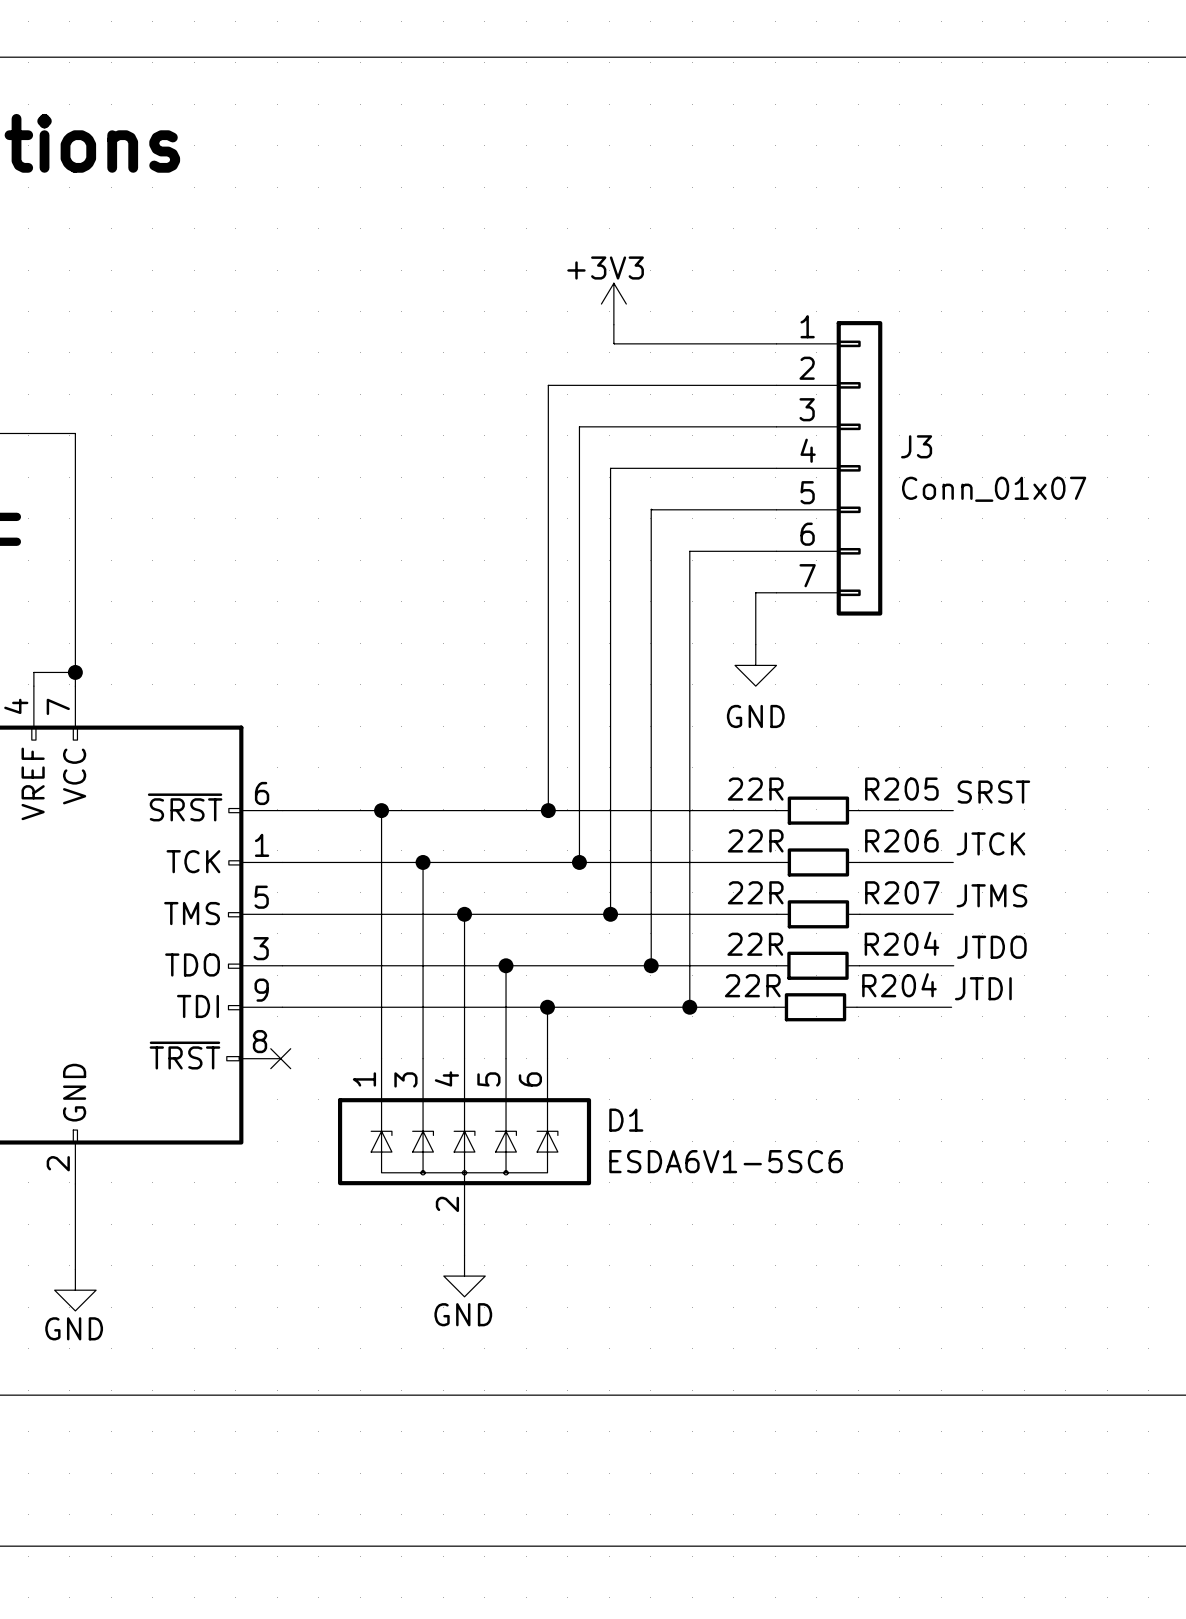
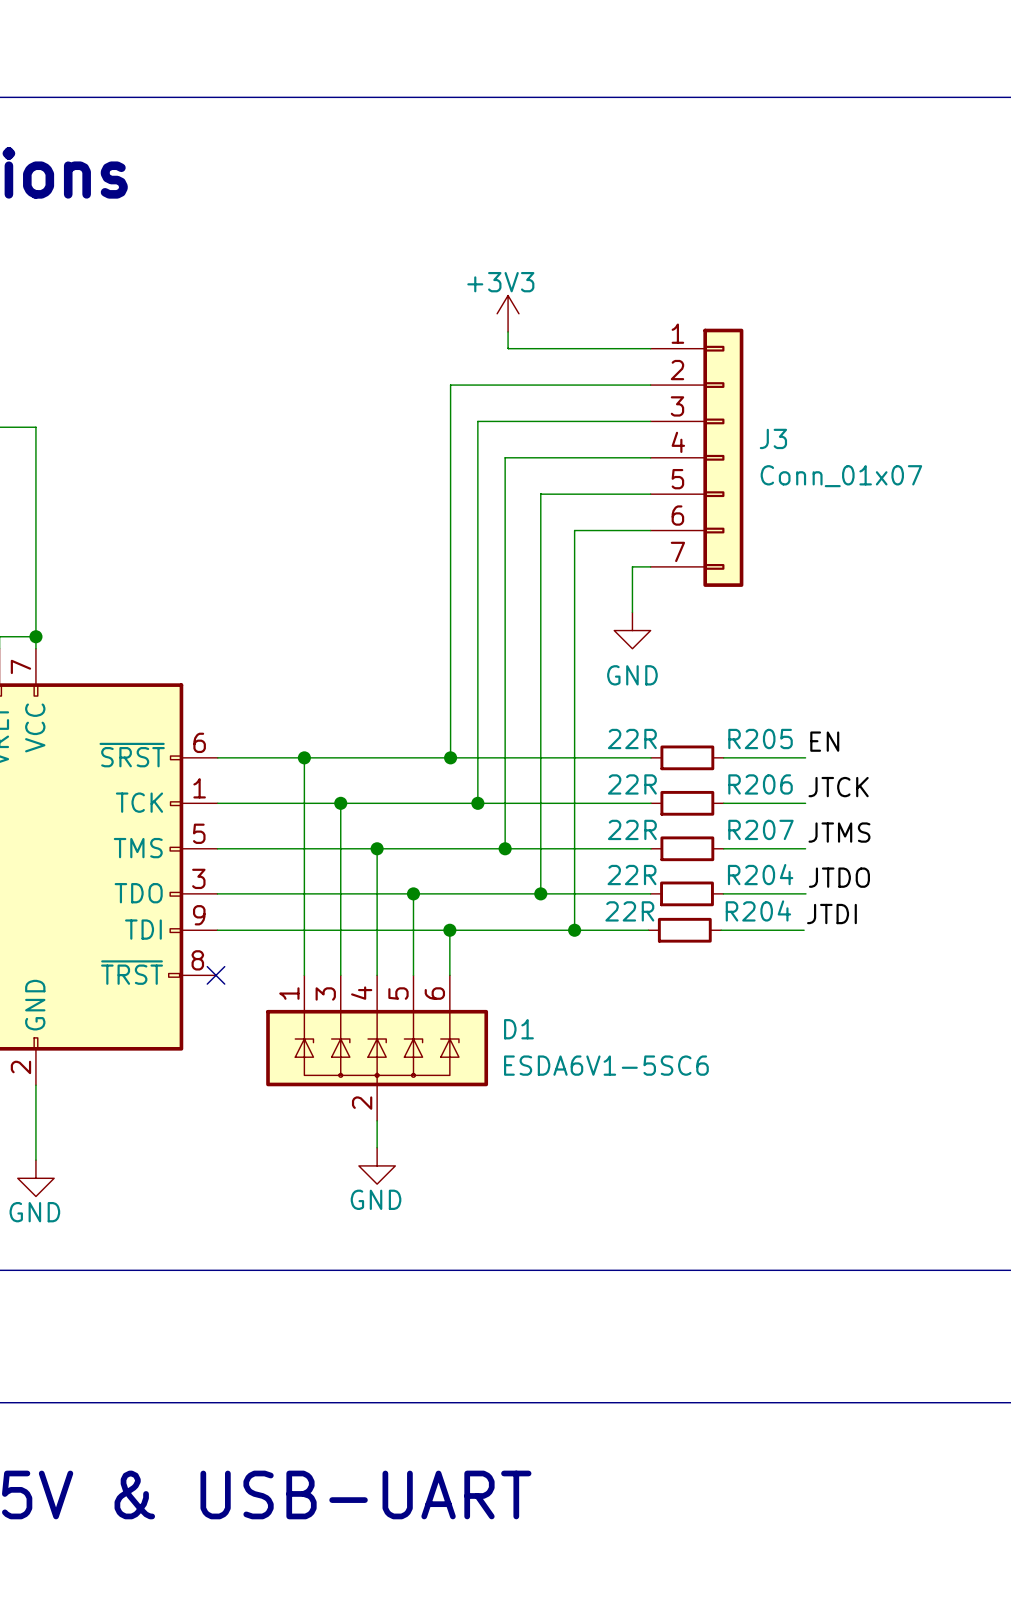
label: SRST (993, 792) -> EN (824, 741)

